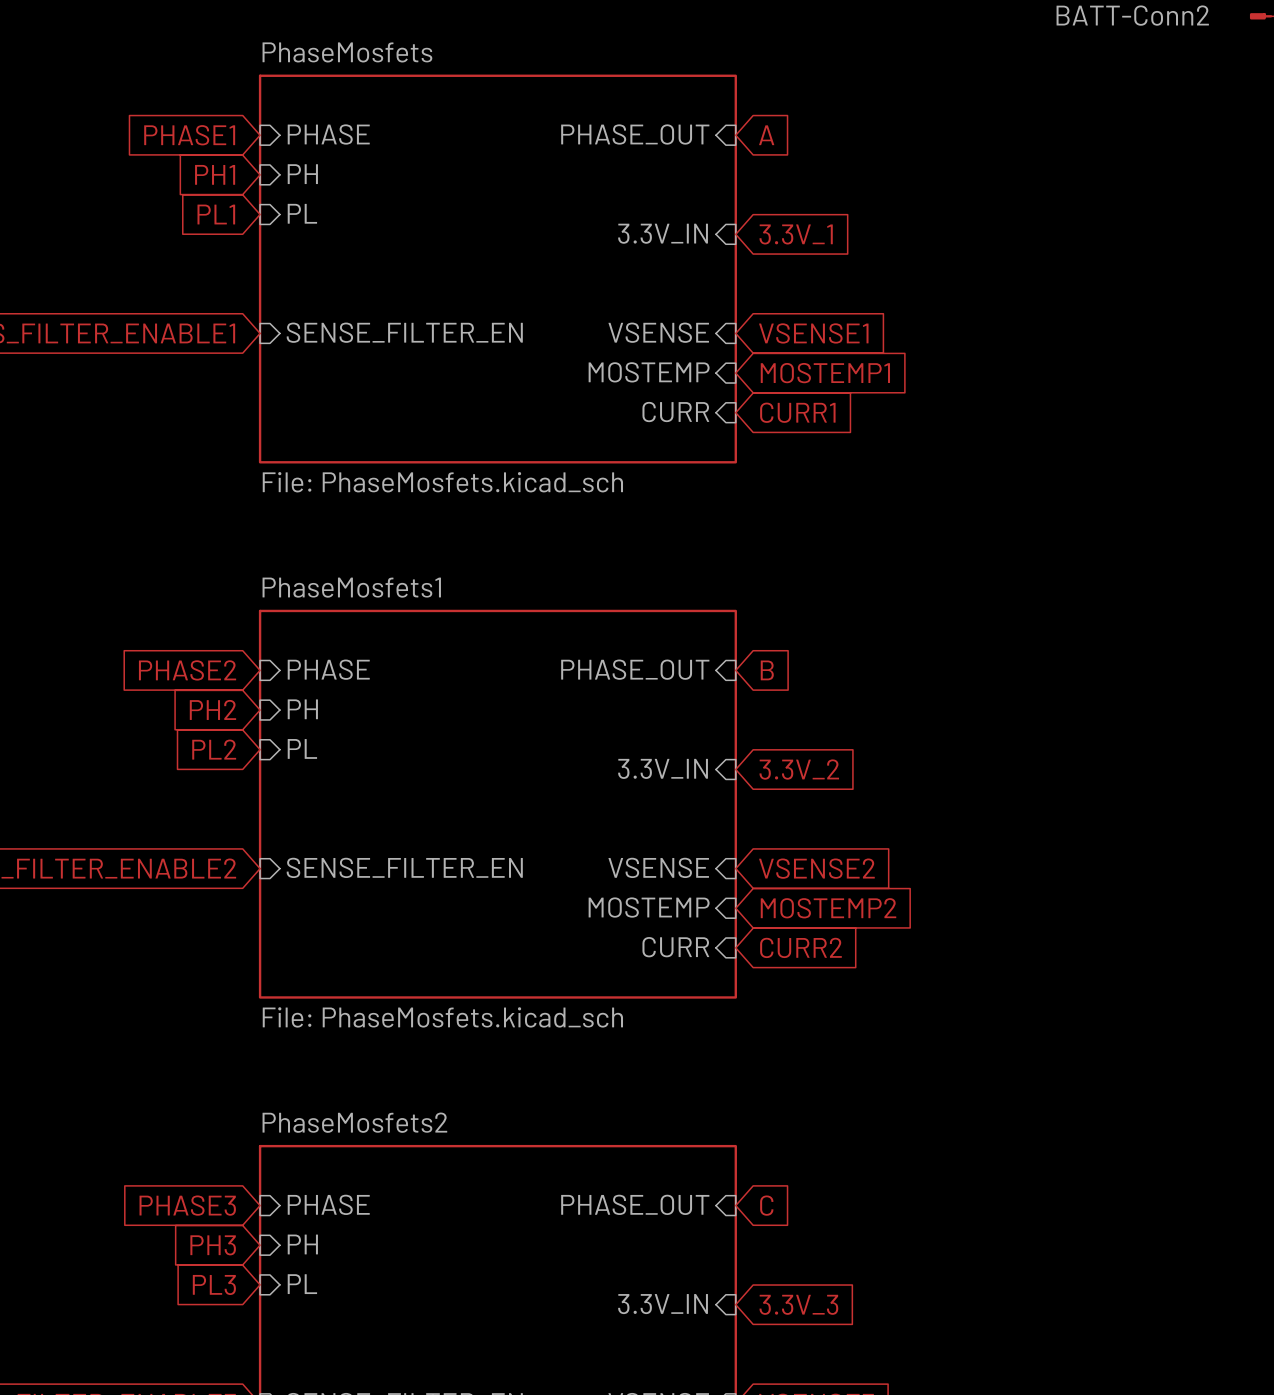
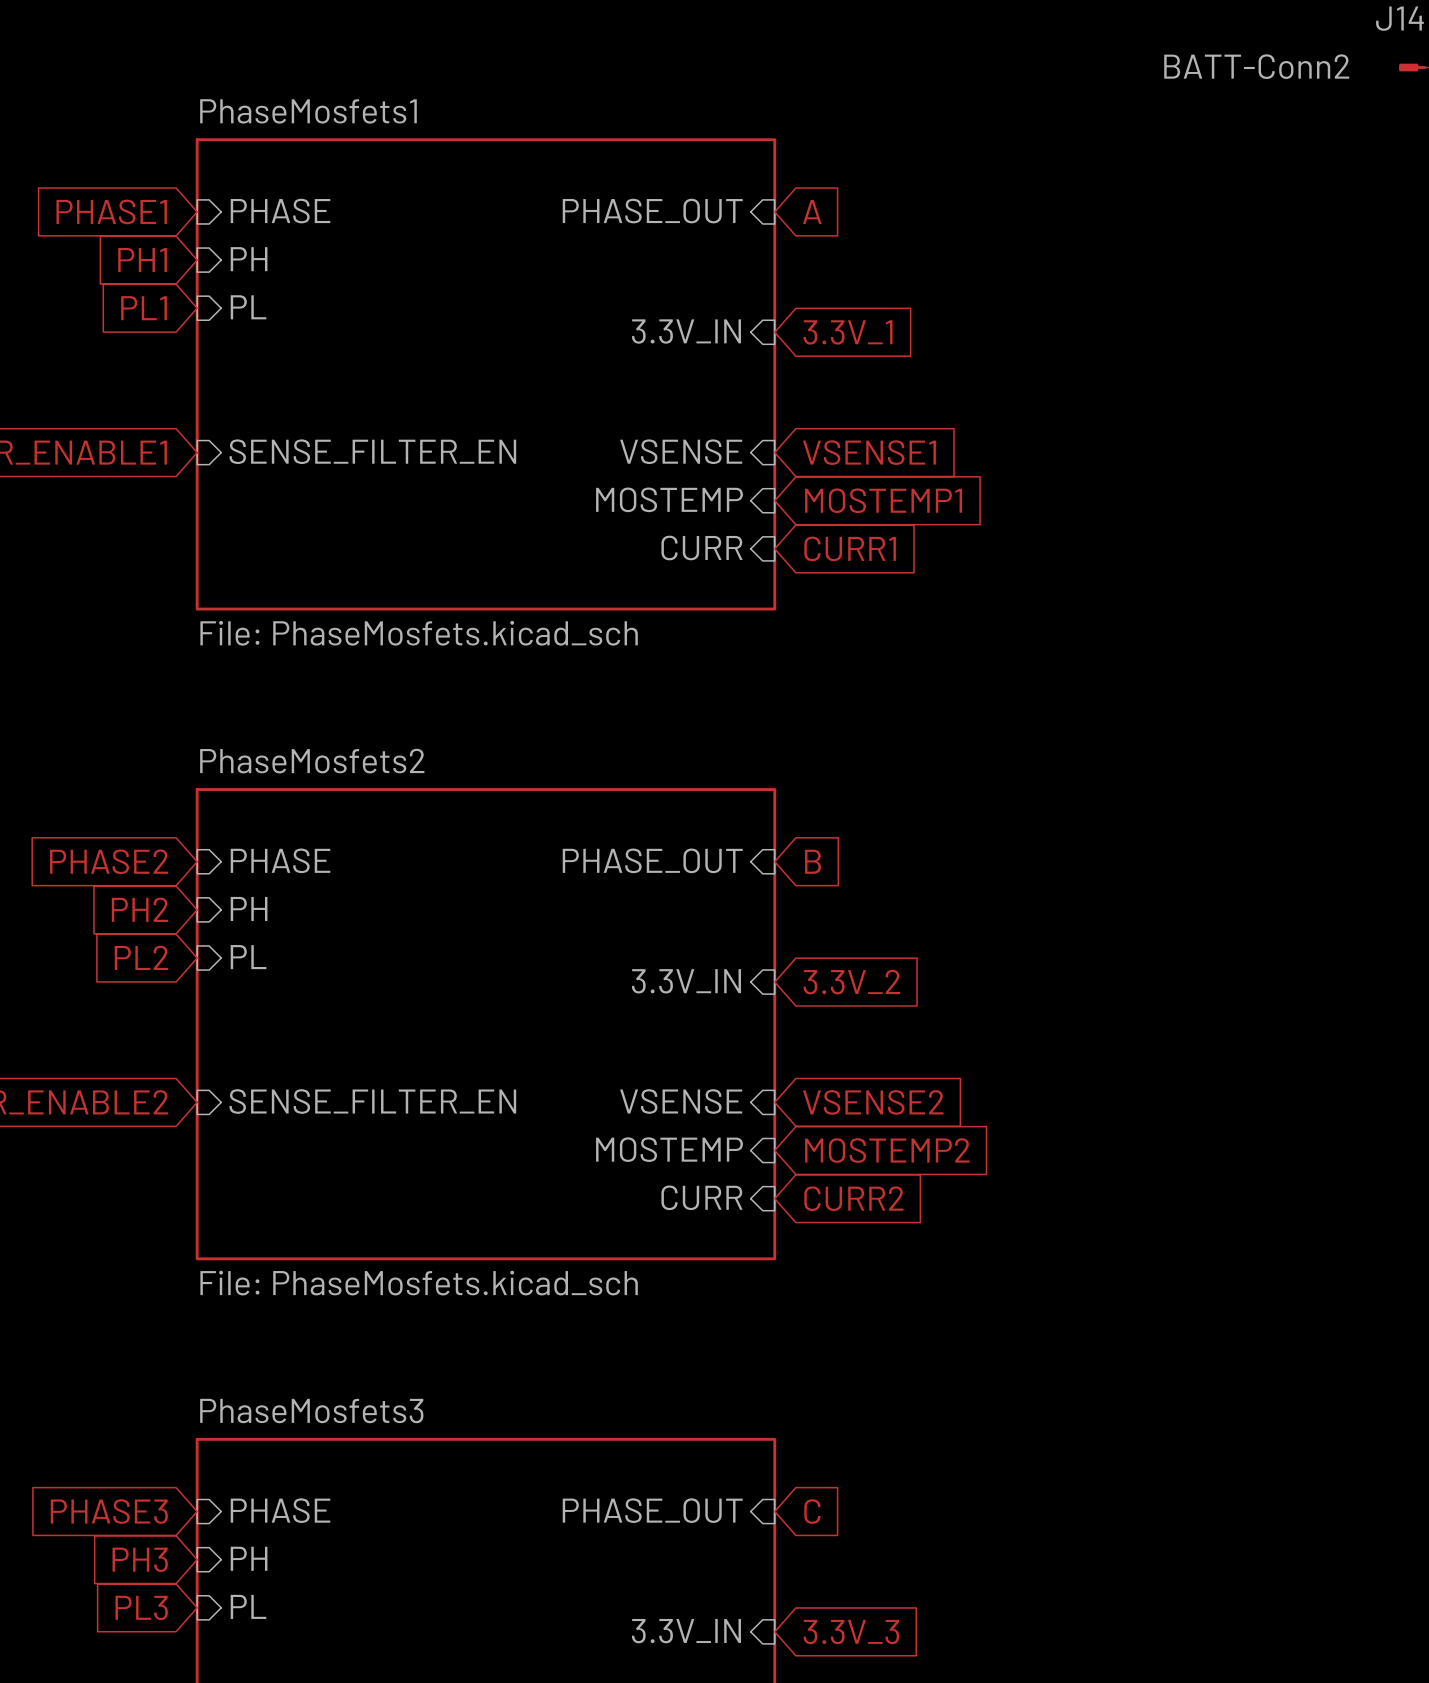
sheet PhaseMosfets name: PhaseMosfets (347, 52) -> PhaseMosfets1 (308, 111)
sheet PhaseMosfets1 name: PhaseMosfets1 (351, 587) -> PhaseMosfets2 (312, 761)
sheet PhaseMosfets2 name: PhaseMosfets2 (354, 1122) -> PhaseMosfets3 (311, 1411)

